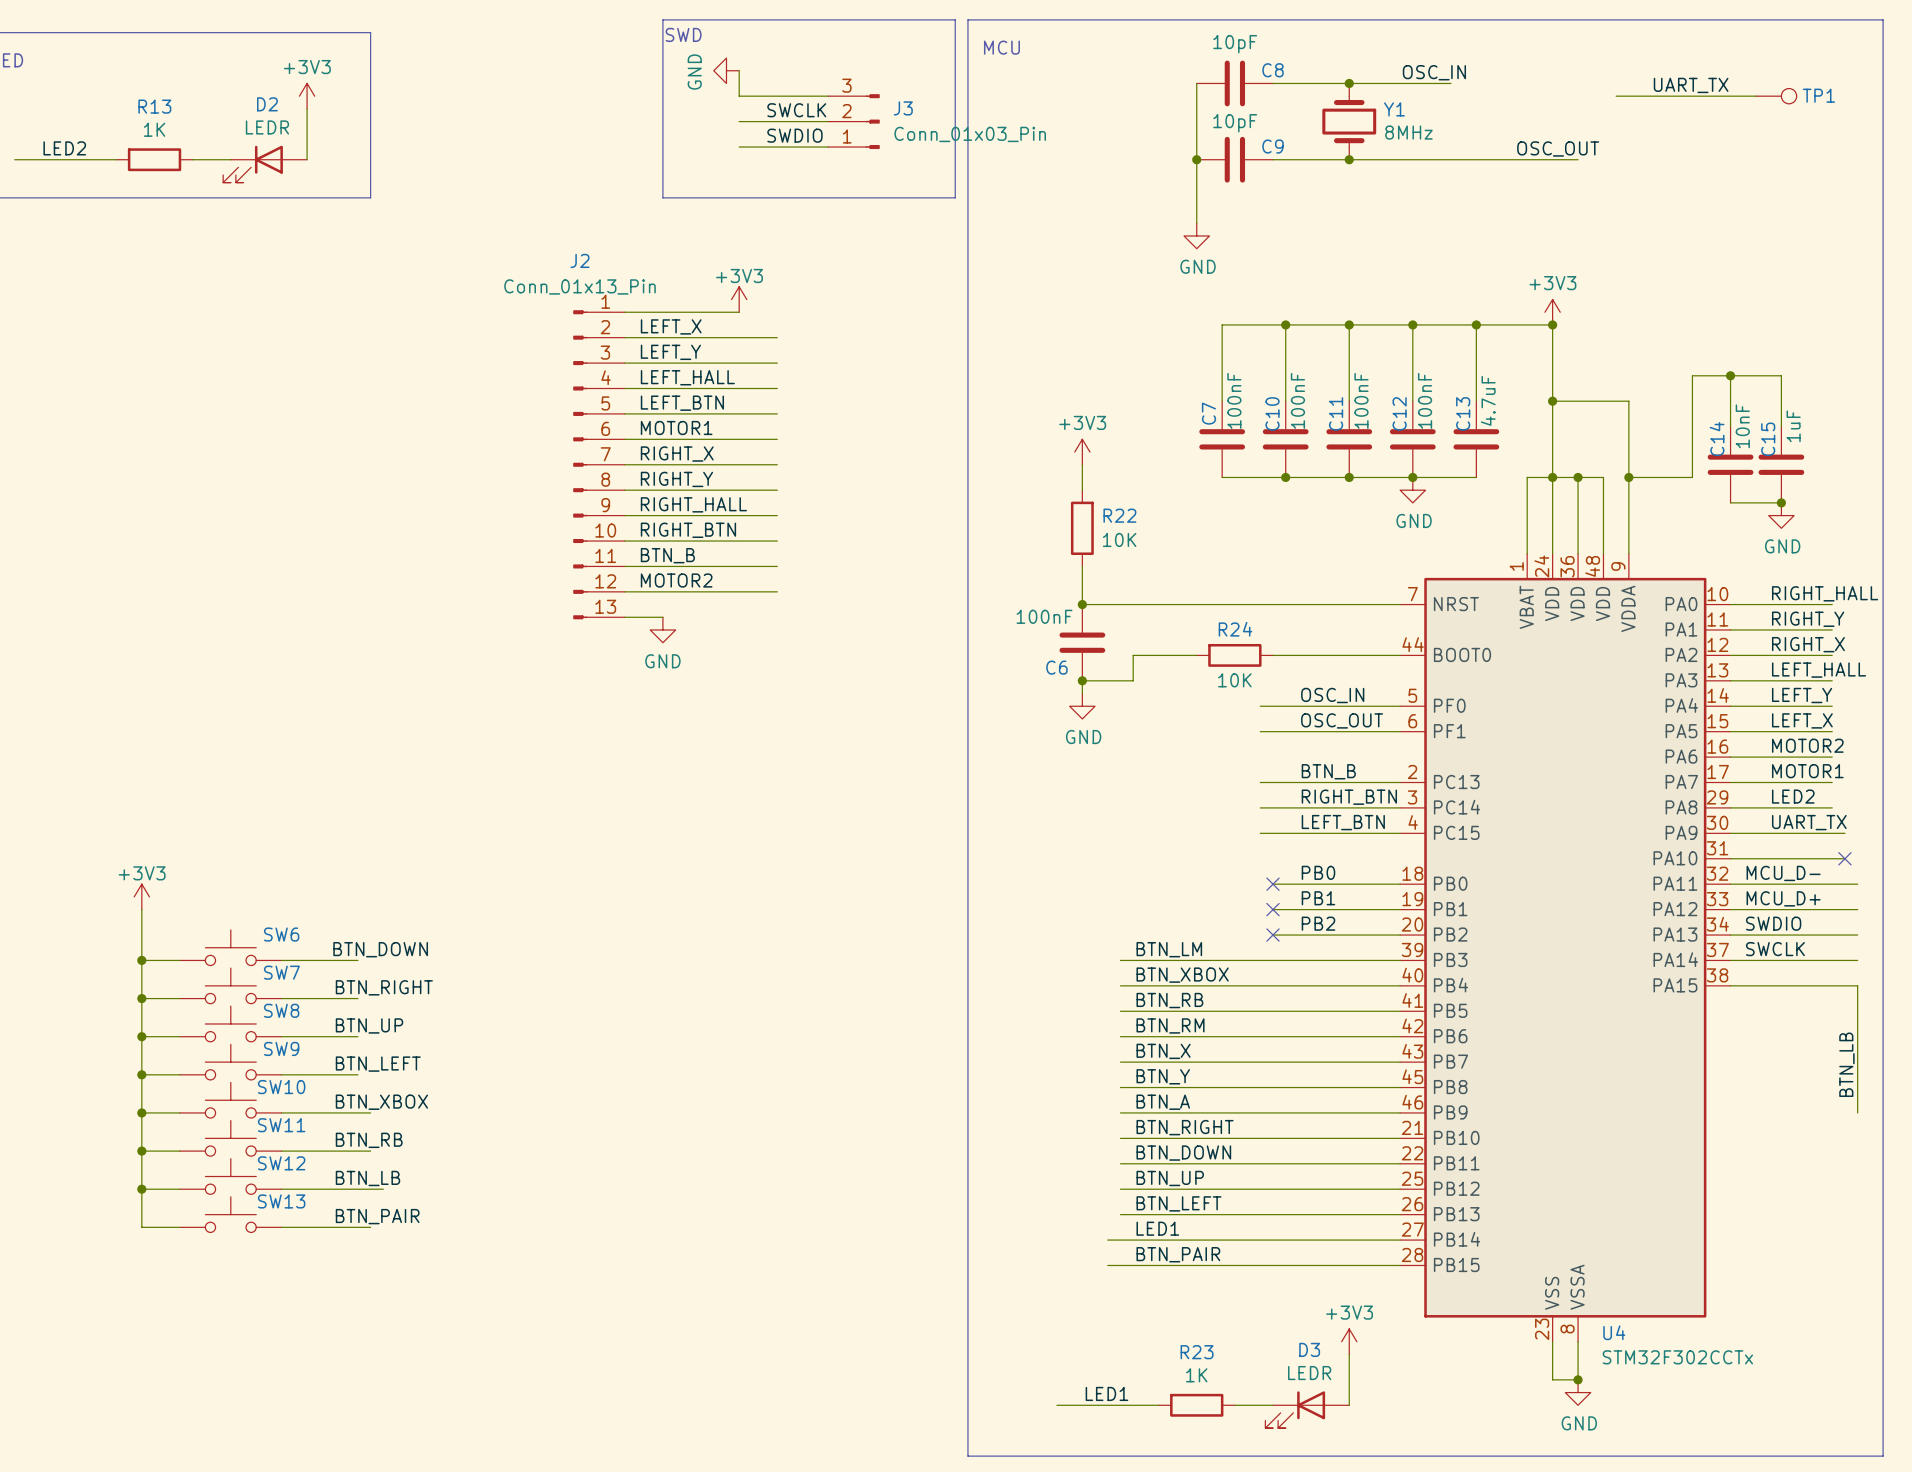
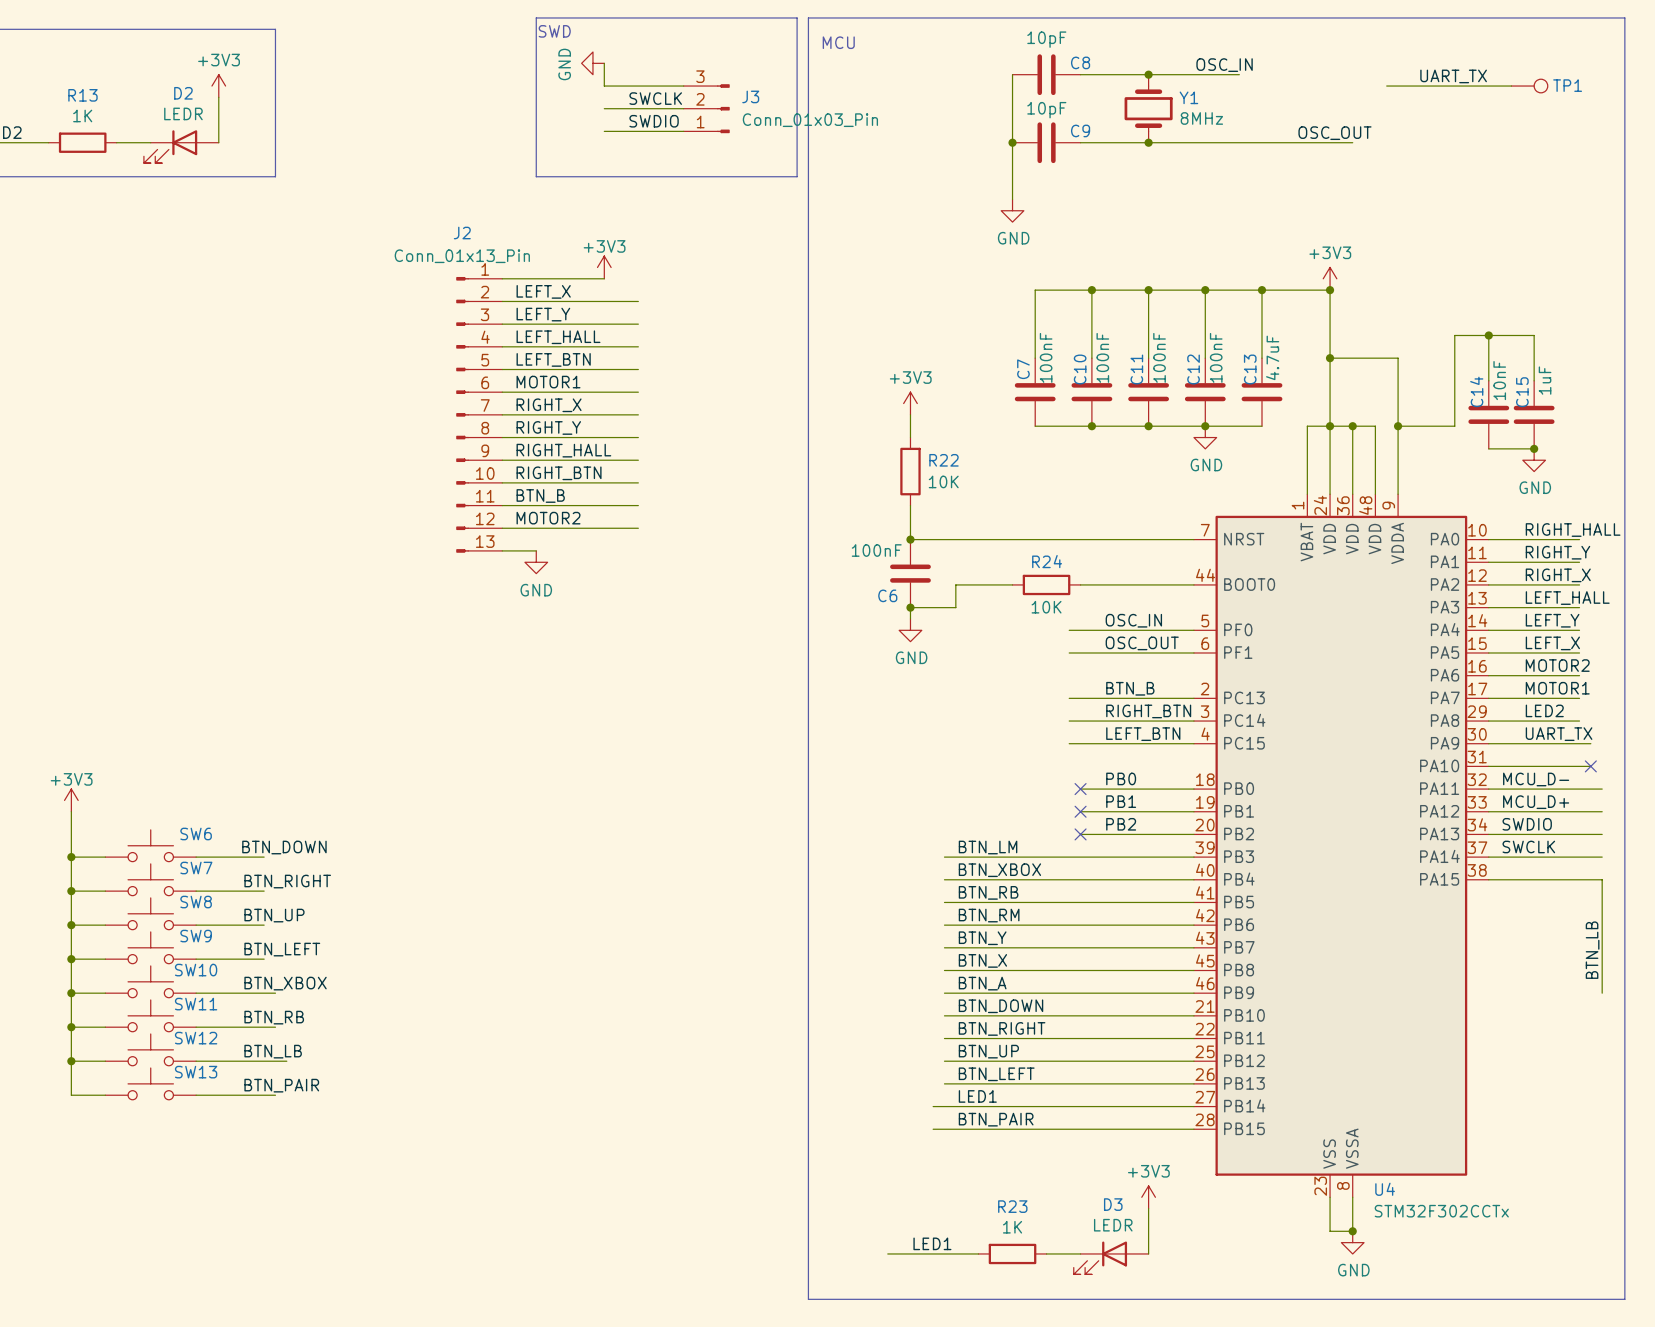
label: BTN_X (1163, 1051) -> BTN_Y (982, 938)
label: BTN_Y (1163, 1076) -> BTN_X (982, 960)
label: BTN_RIGHT (1185, 1127) -> BTN_DOWN (1001, 1006)
label: BTN_DOWN (1183, 1153) -> BTN_RIGHT (1002, 1028)

